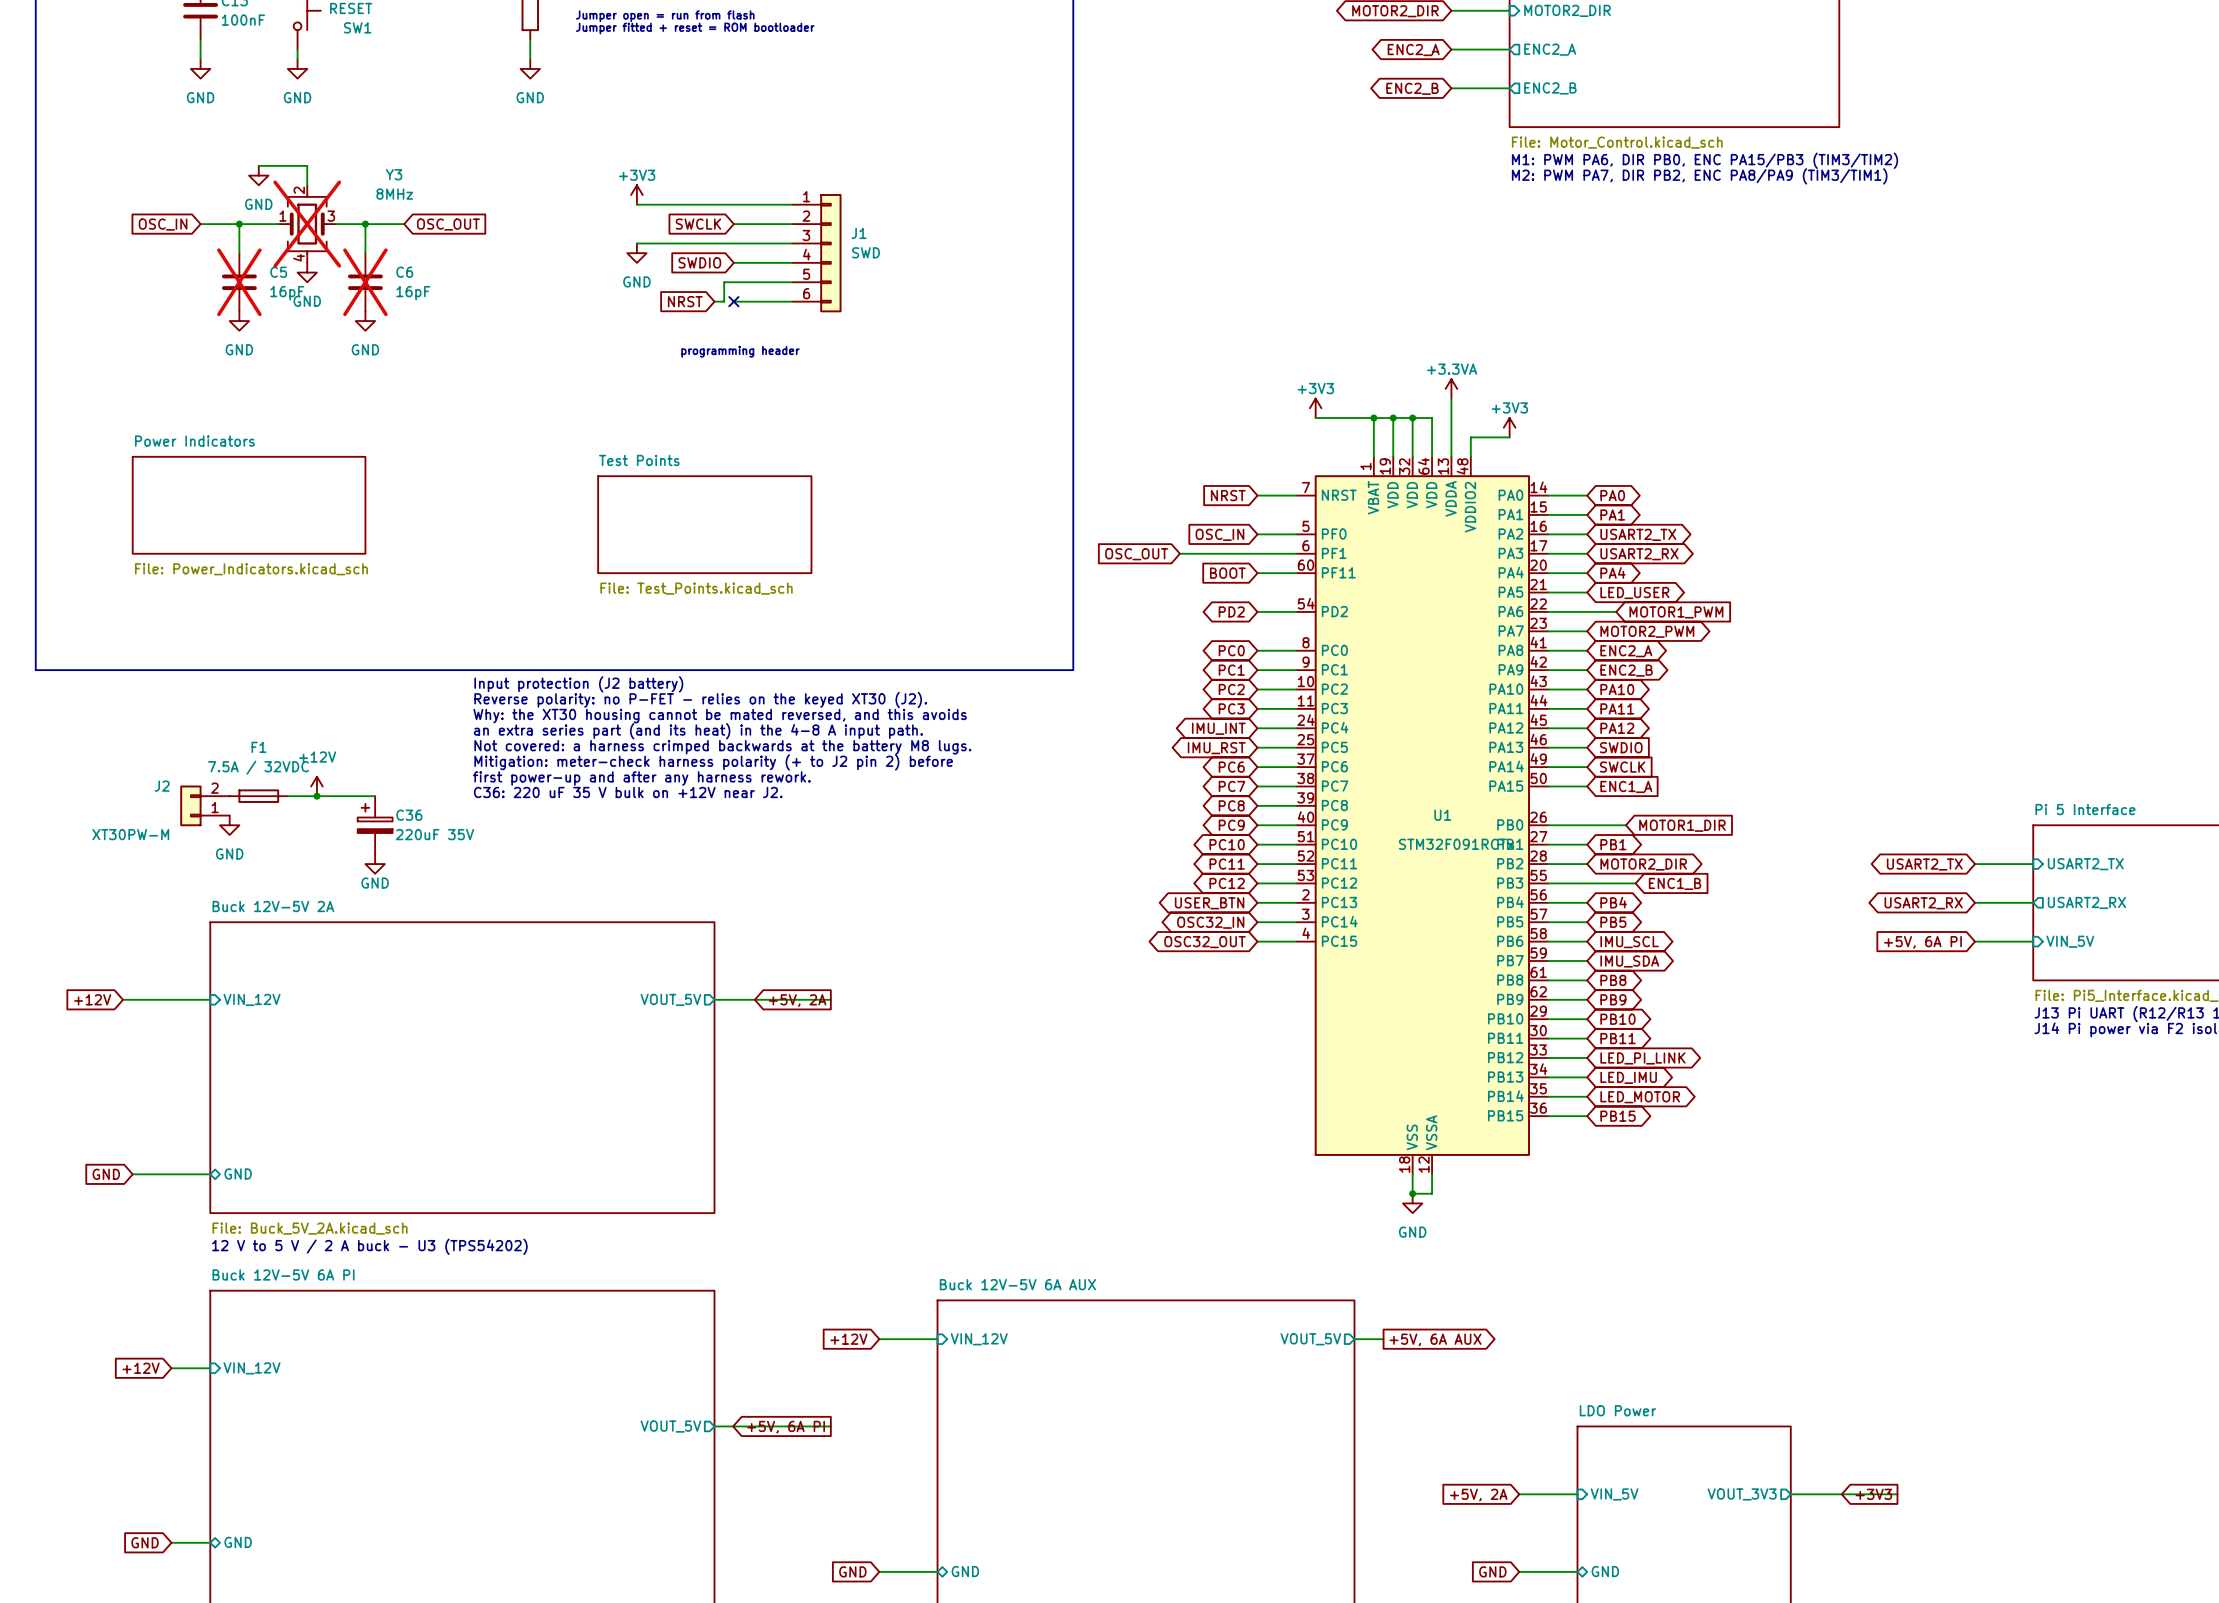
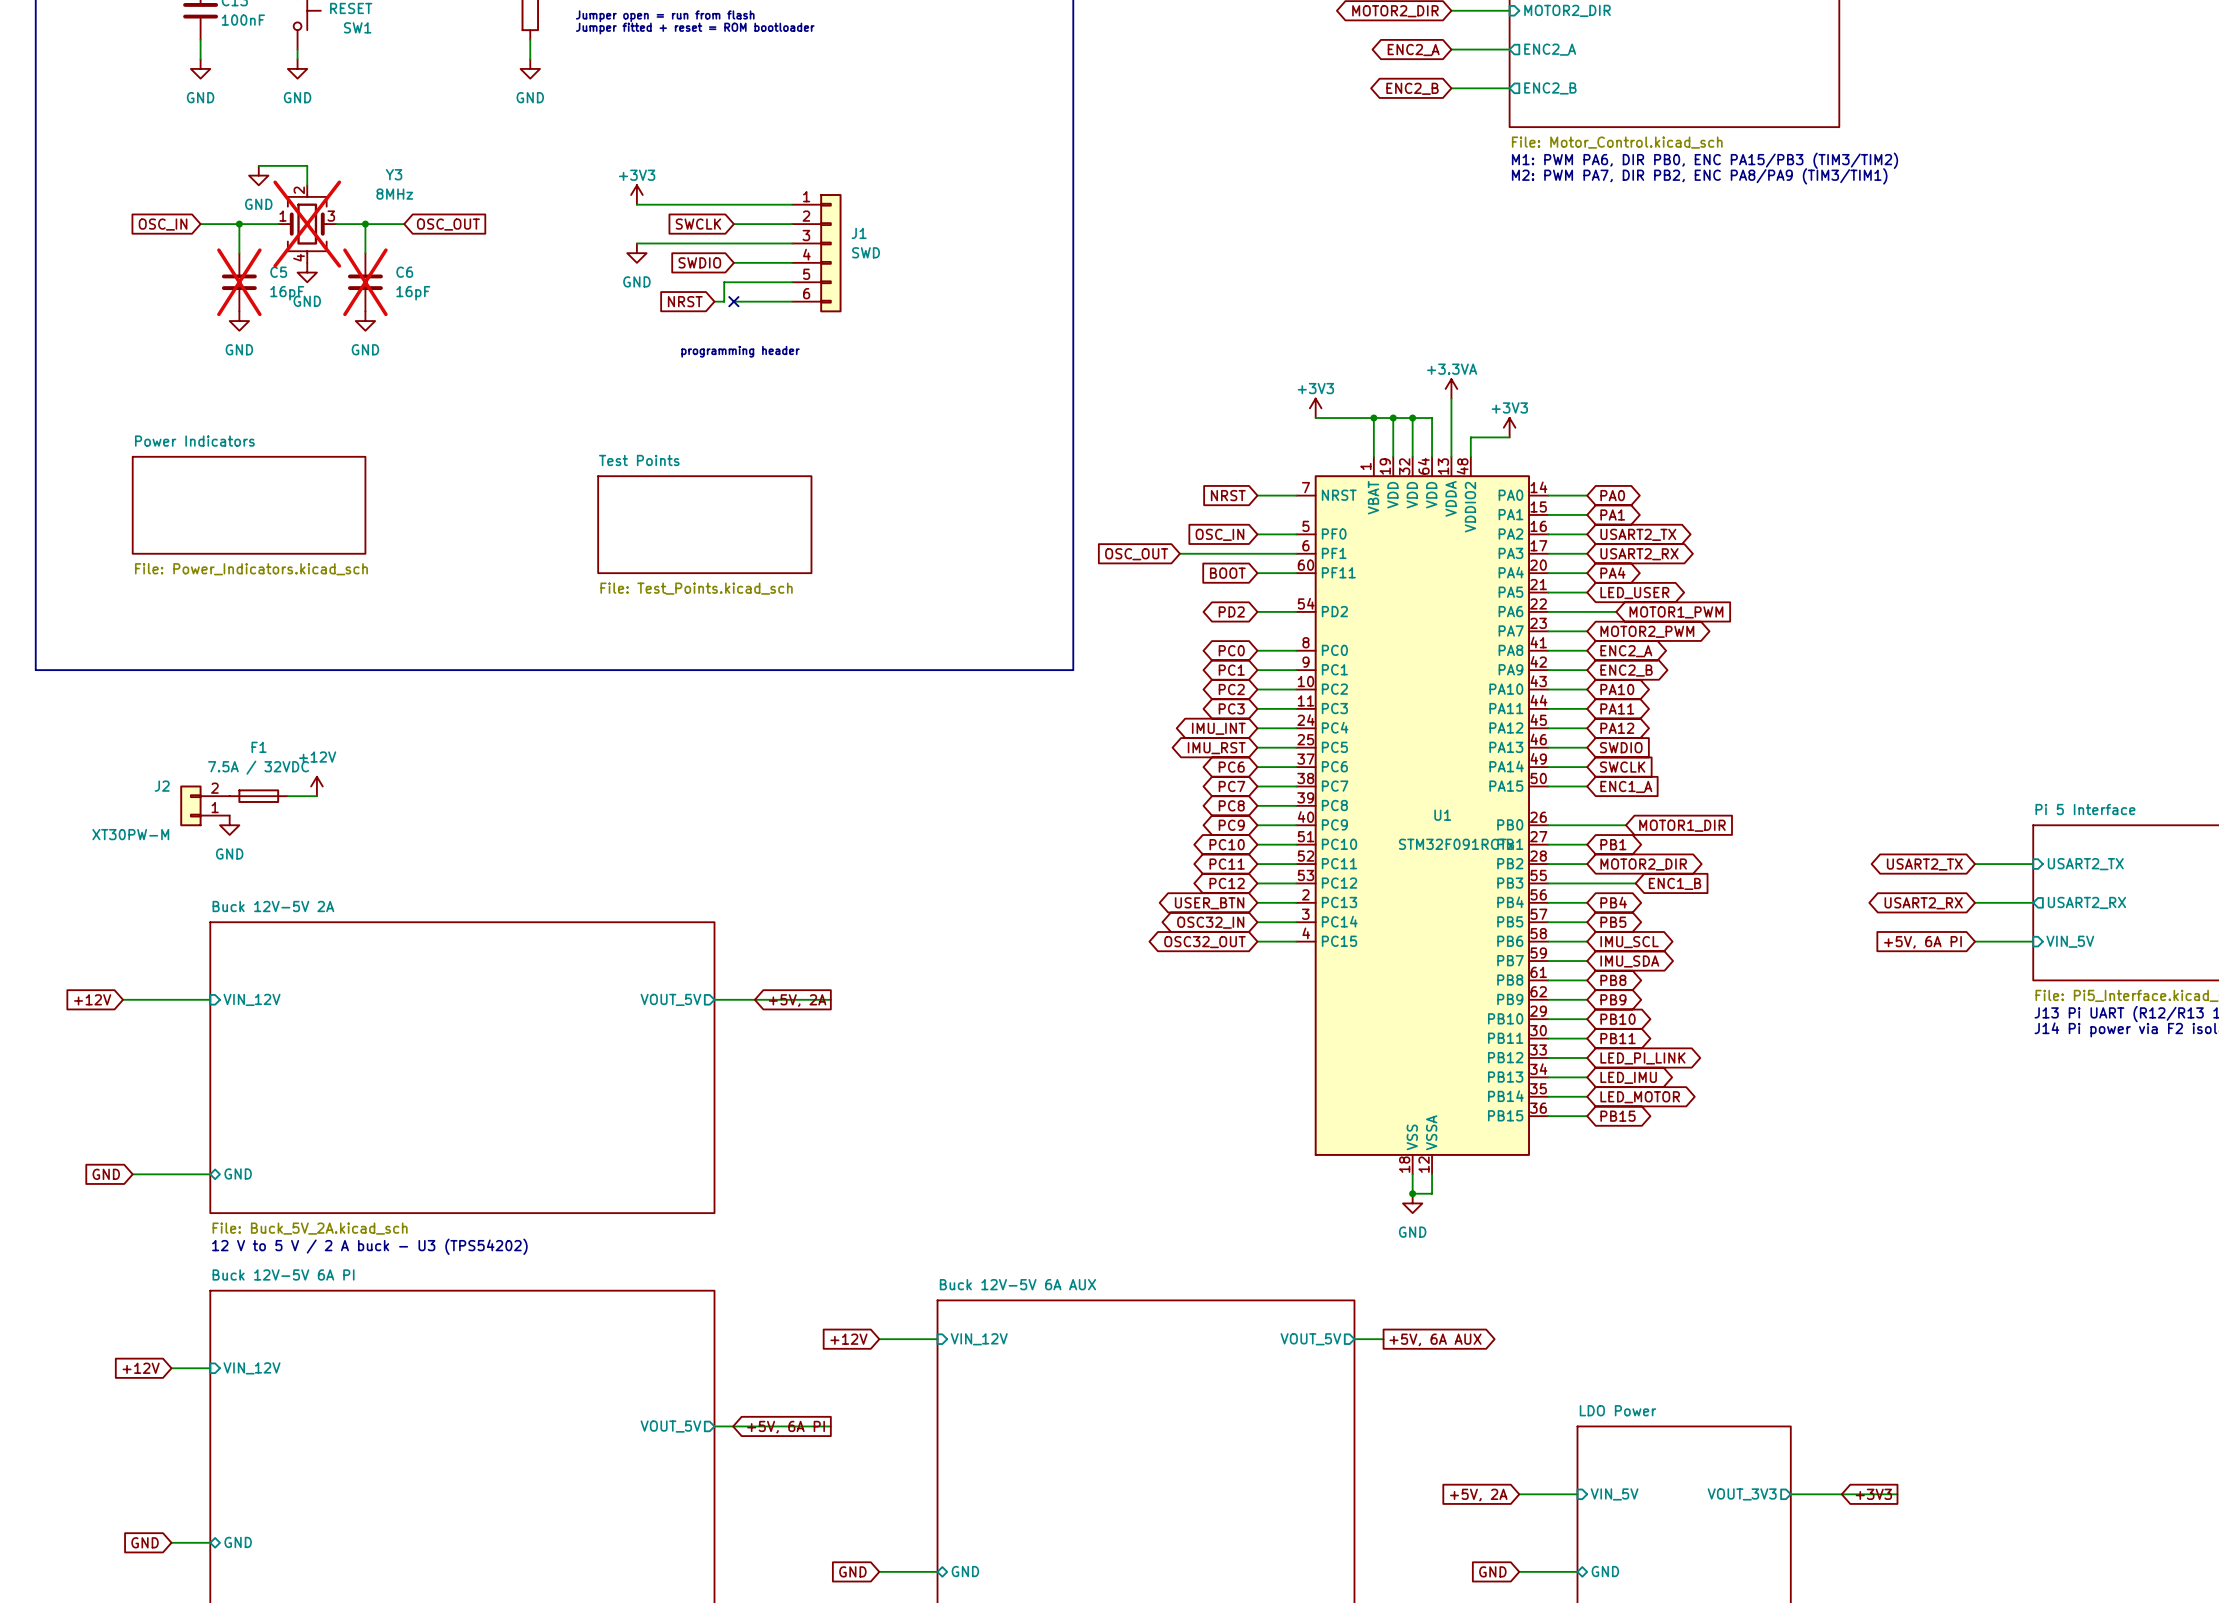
text: Input protection (J2 battery) (578, 684) -> none
text: Reverse polarity: no P-FET - relies on the keyed XT30 (J2). (700, 699) -> none
text: Why: the XT30 housing cannot be mated reversed, and this avoids (720, 716) -> none
text: an extra series part (and its heat) in the 4-8 A input path. (698, 731) -> none
text: Not covered: a harness crimped backwards at the battery M8 lugs. (722, 747) -> none
text: Mitigation: meter-check harness polarity (+ to J2 pin 2) before (713, 762) -> none
text: first power-up and after any harness rework. (641, 778) -> none
text: C36: 220 uF 35 V bulk on +12V near J2. (628, 792) -> none
wire: (316, 796) (375, 796) -> none
junction: (316, 796) -> none
C36: 220uF 35V (375, 825) -> none
power symbol: GND (375, 864) -> none

